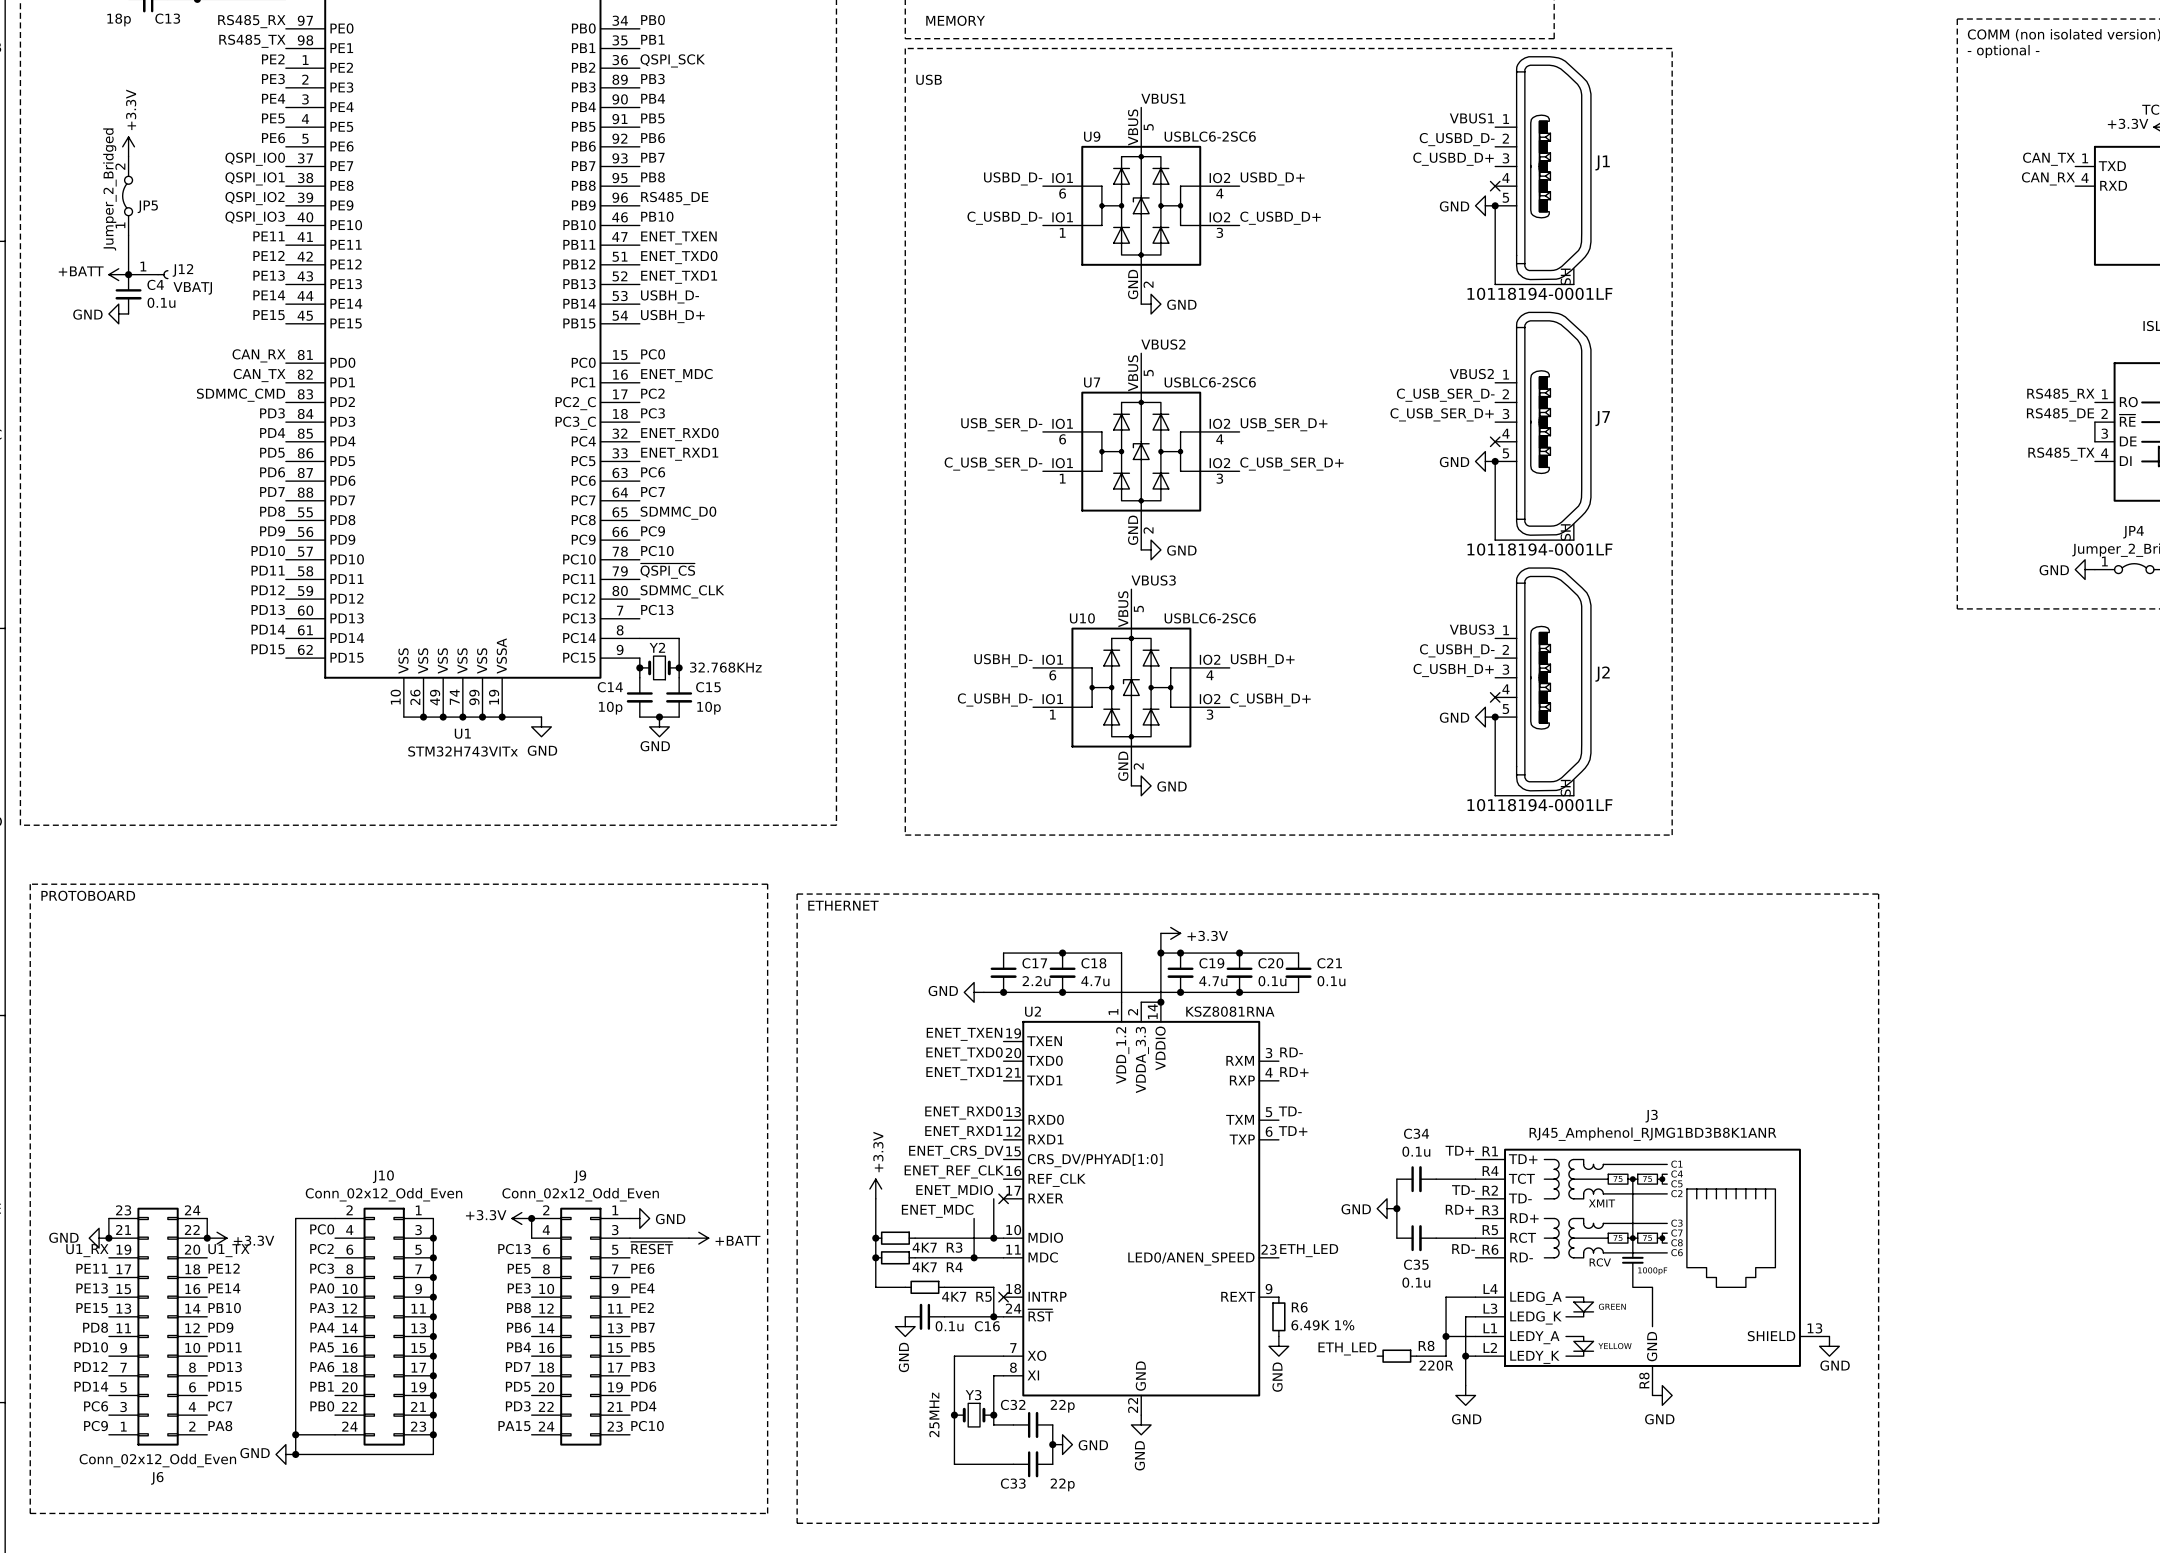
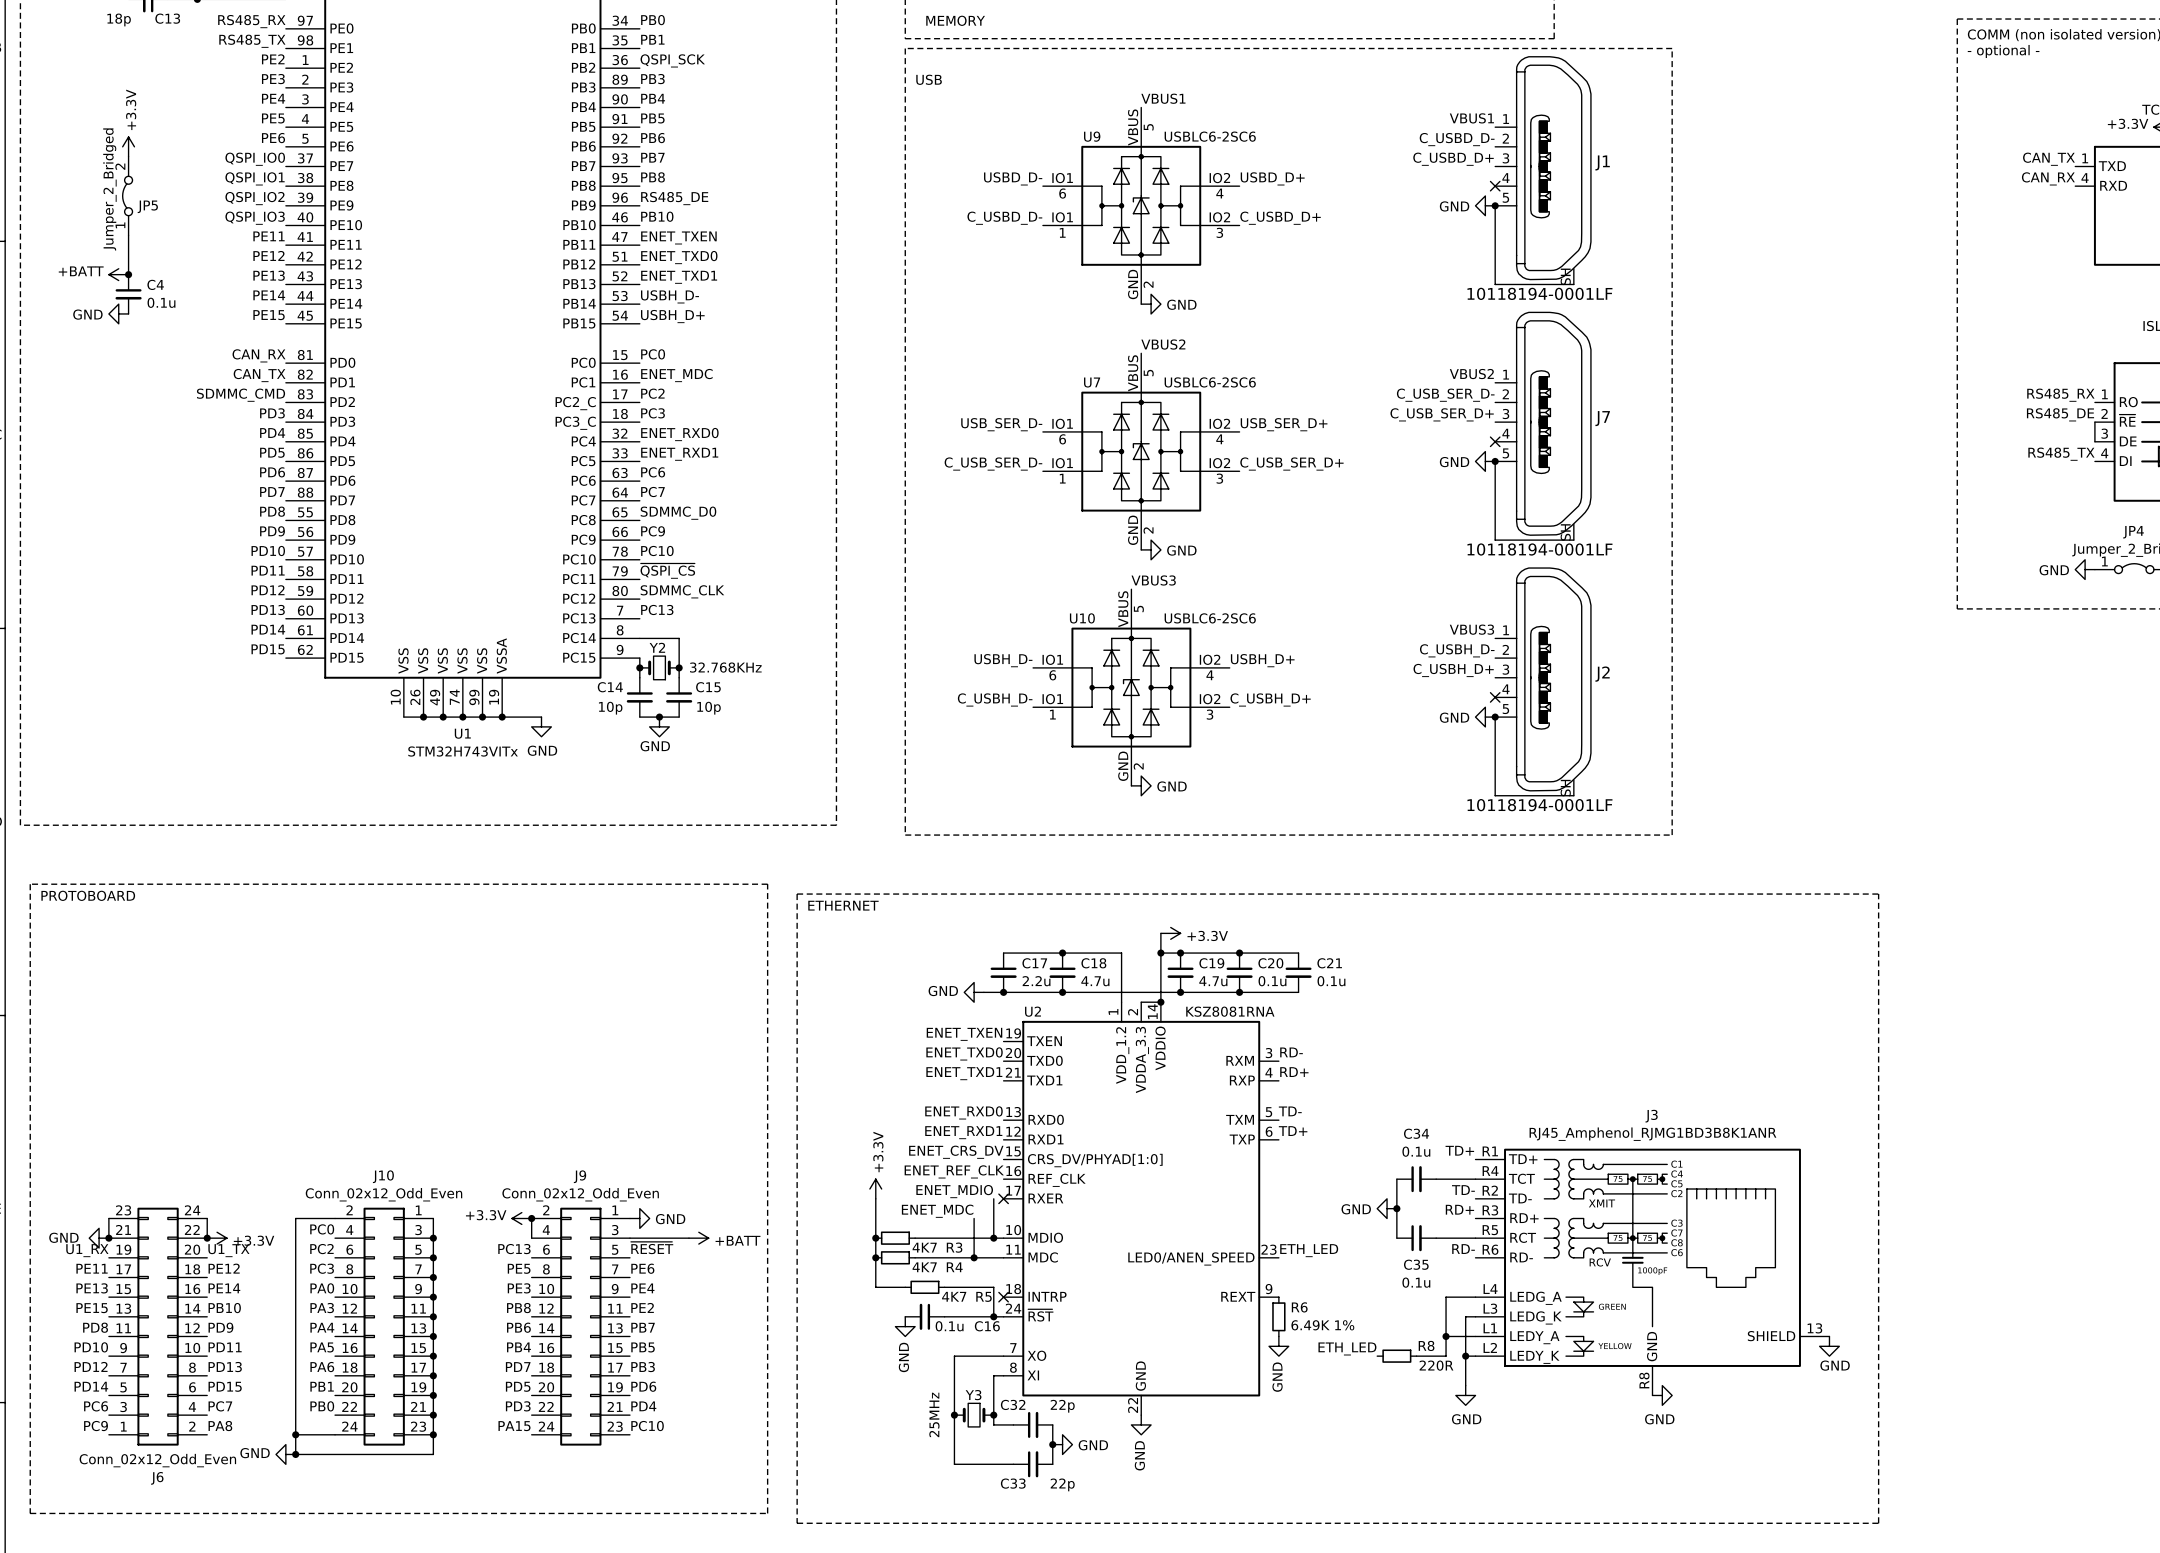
J12: VBATJ (148, 274) -> none

